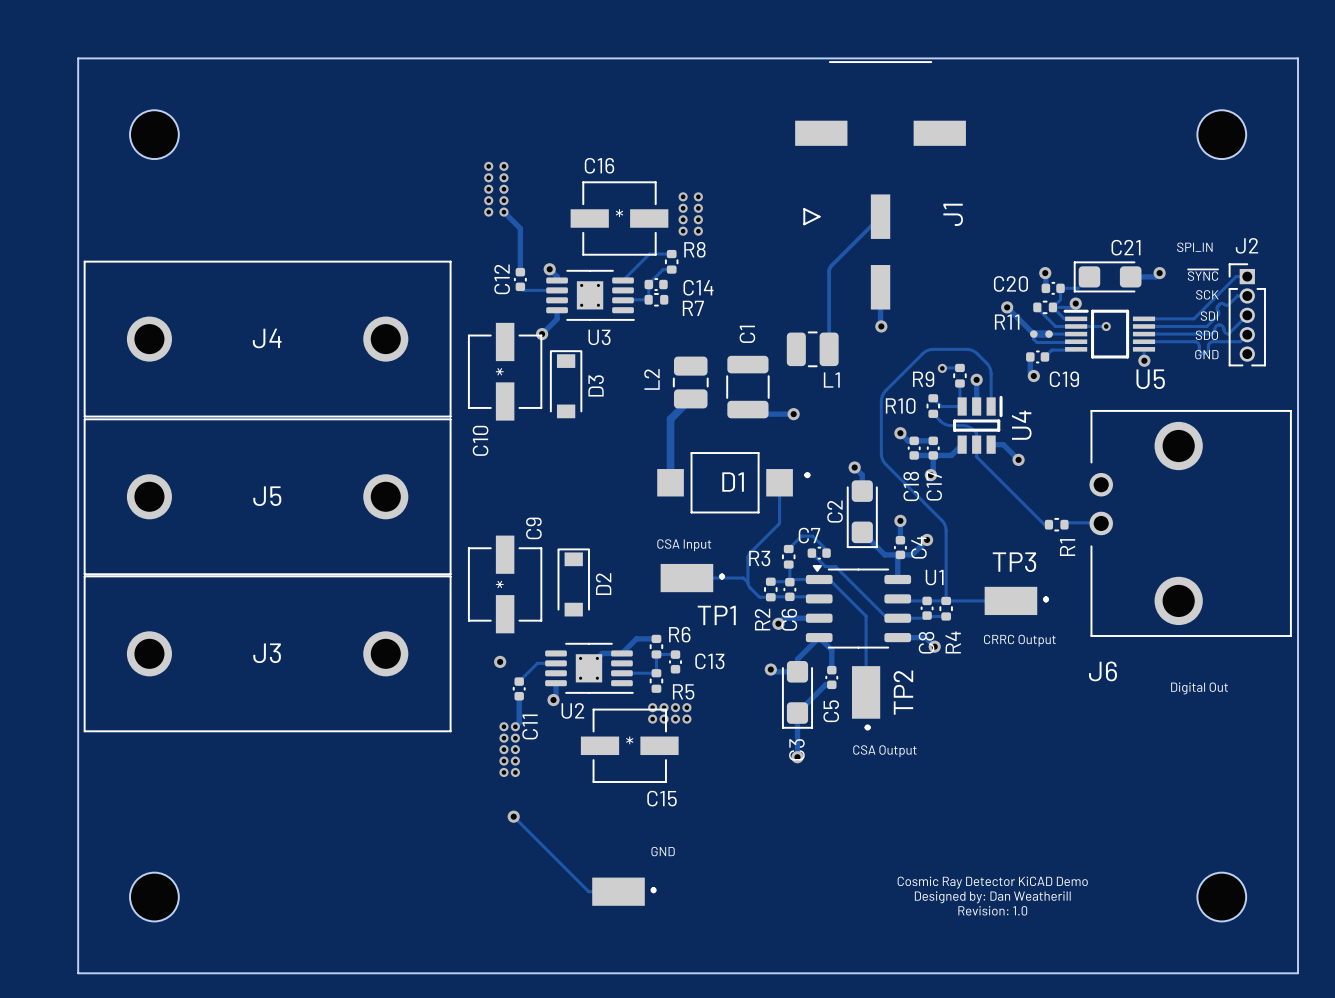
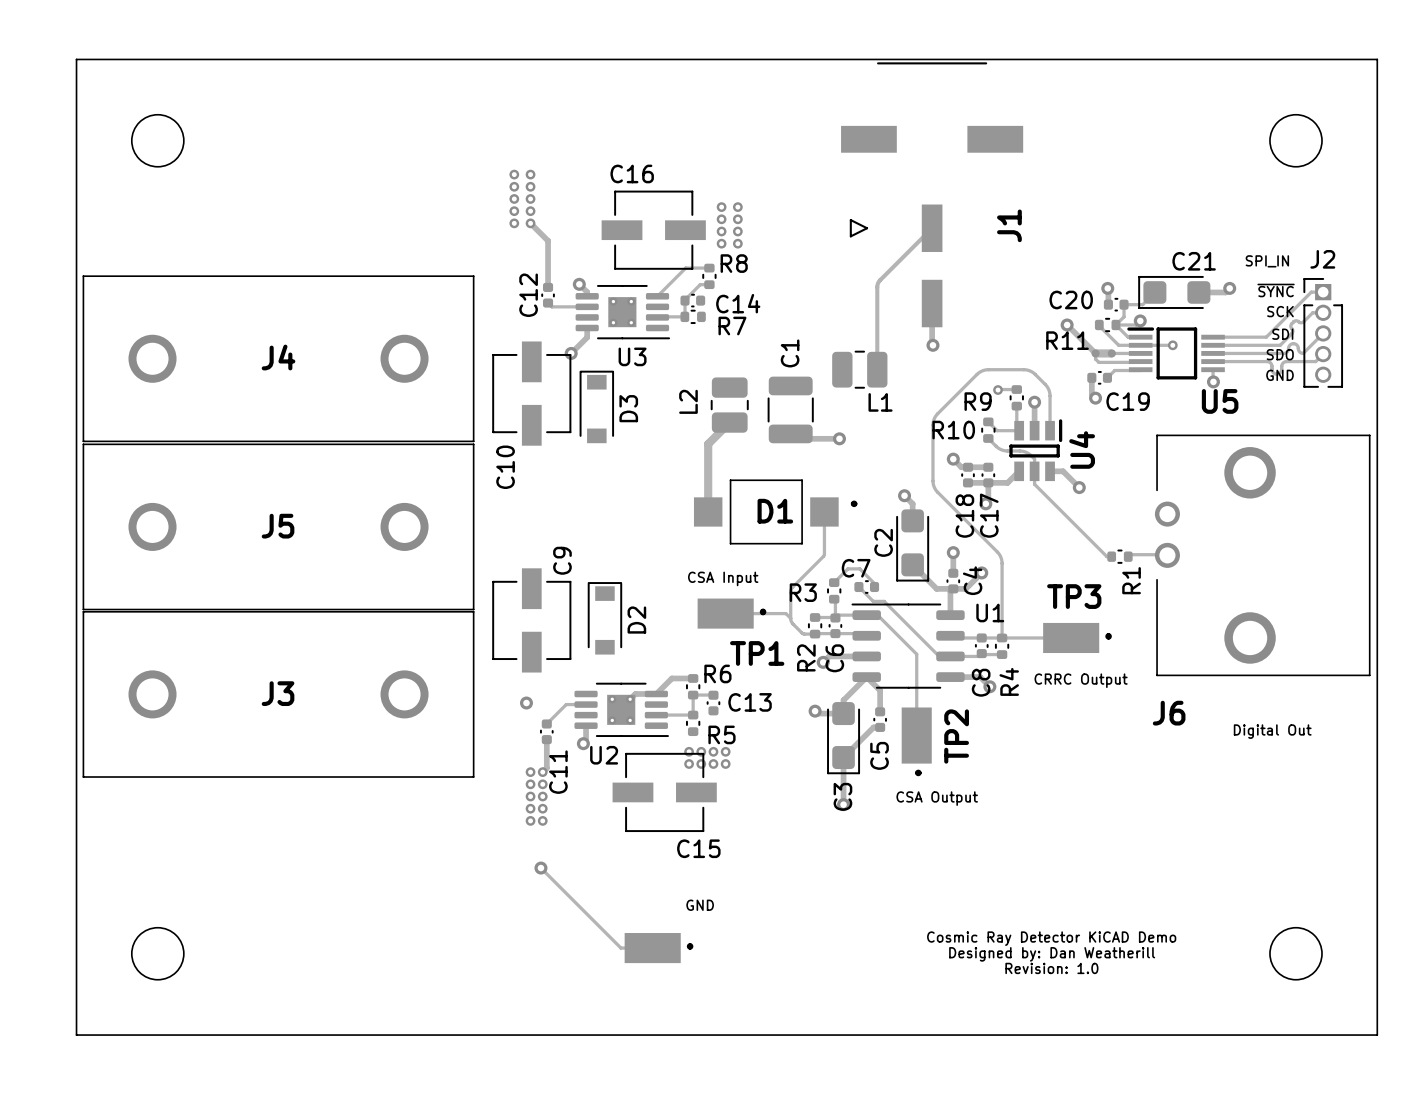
C16 text: * (619, 213) -> none
C10 text: * (499, 371) -> none
U1 footprint: [805, 565, 912, 649] -> [851, 603, 965, 689]
C9 text: * (499, 584) -> none
C15 text: * (629, 740) -> none

